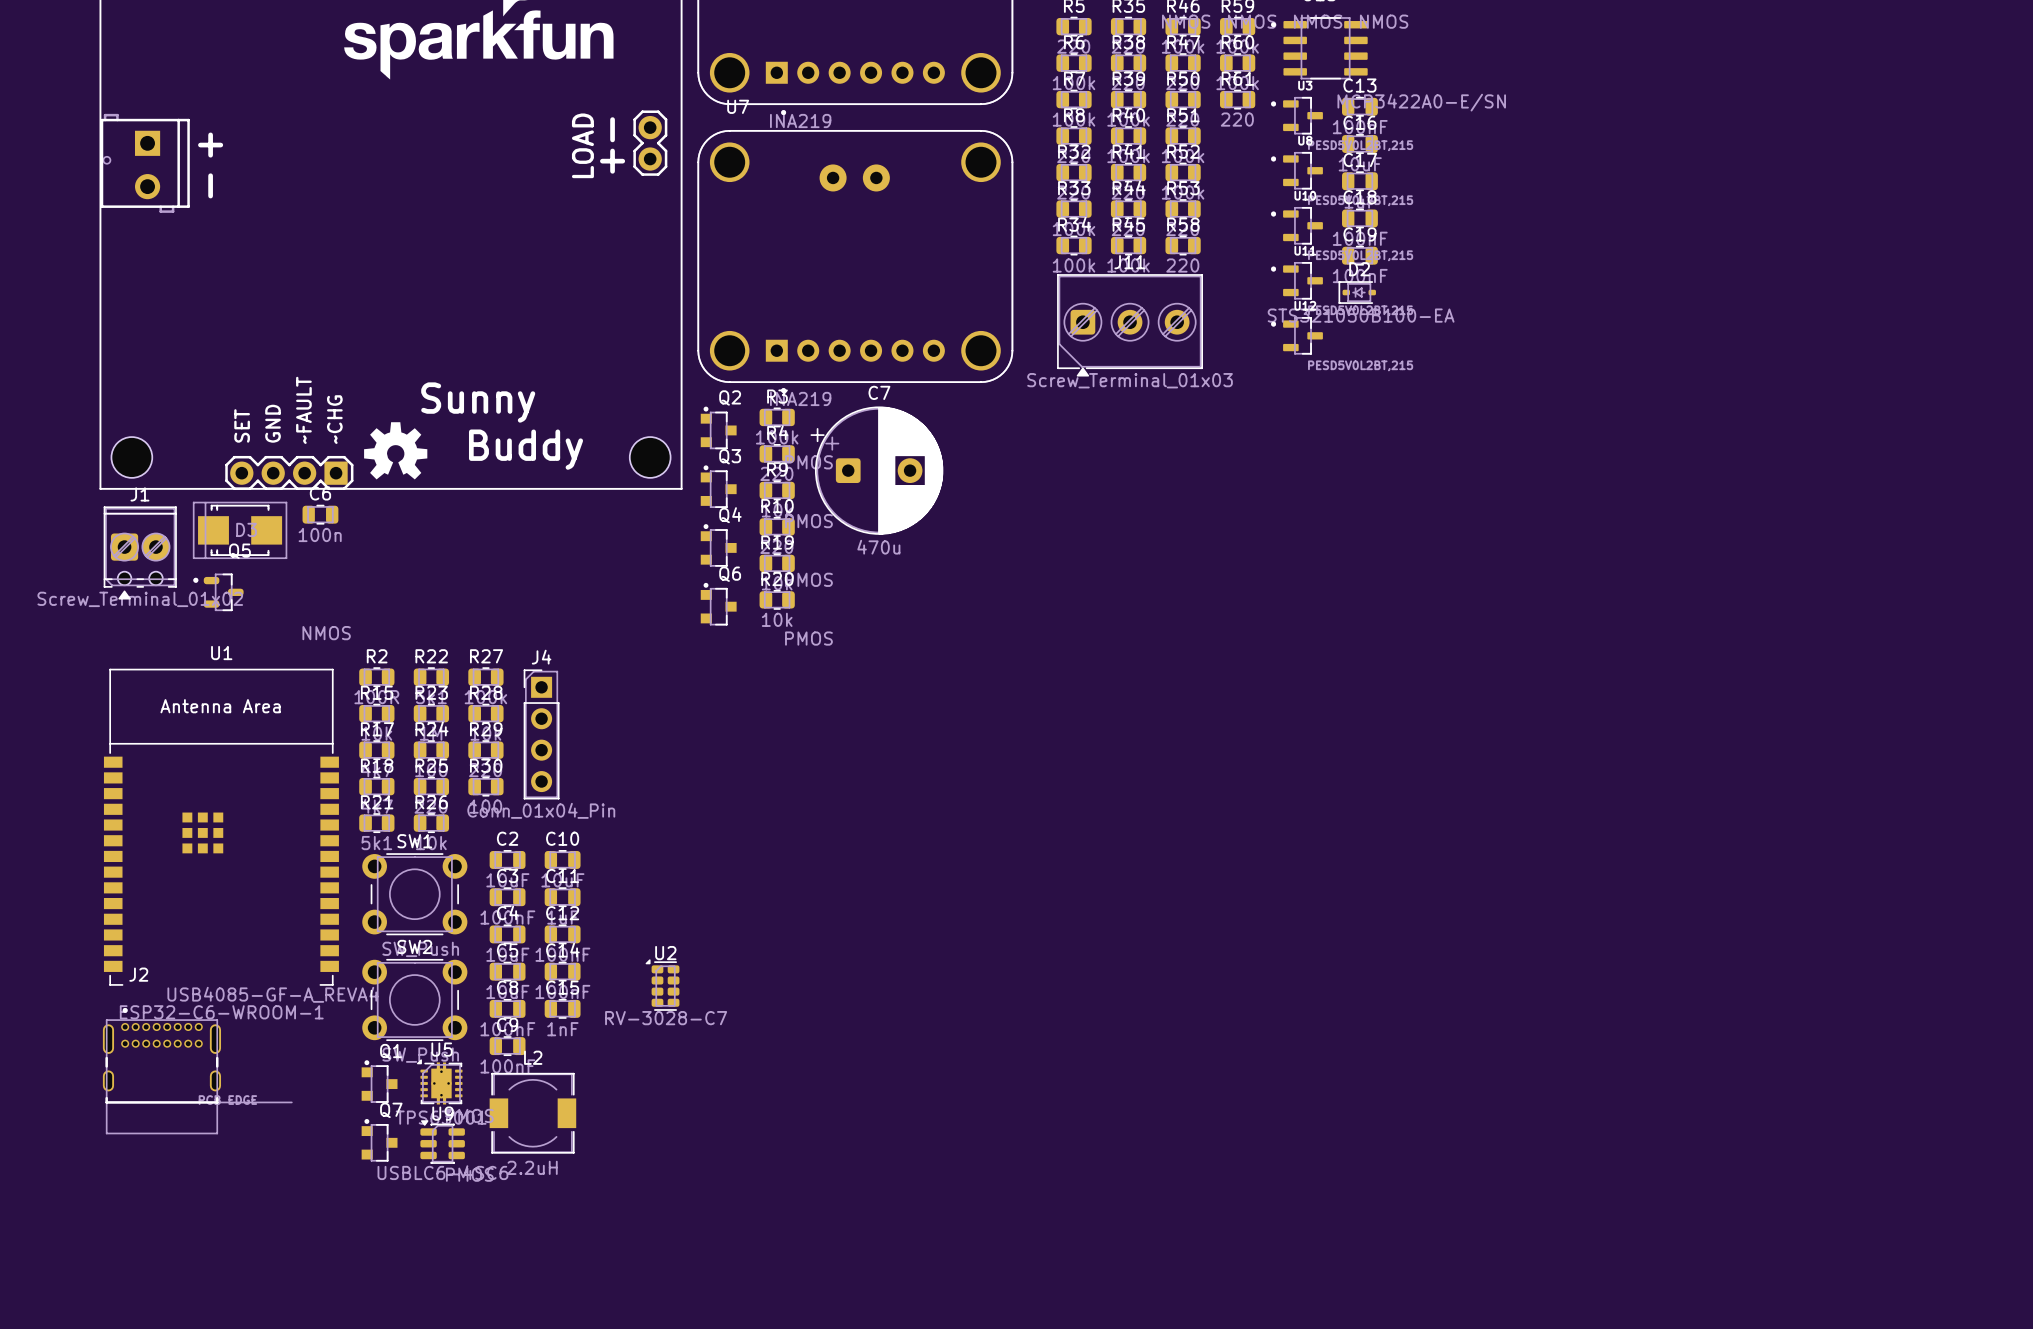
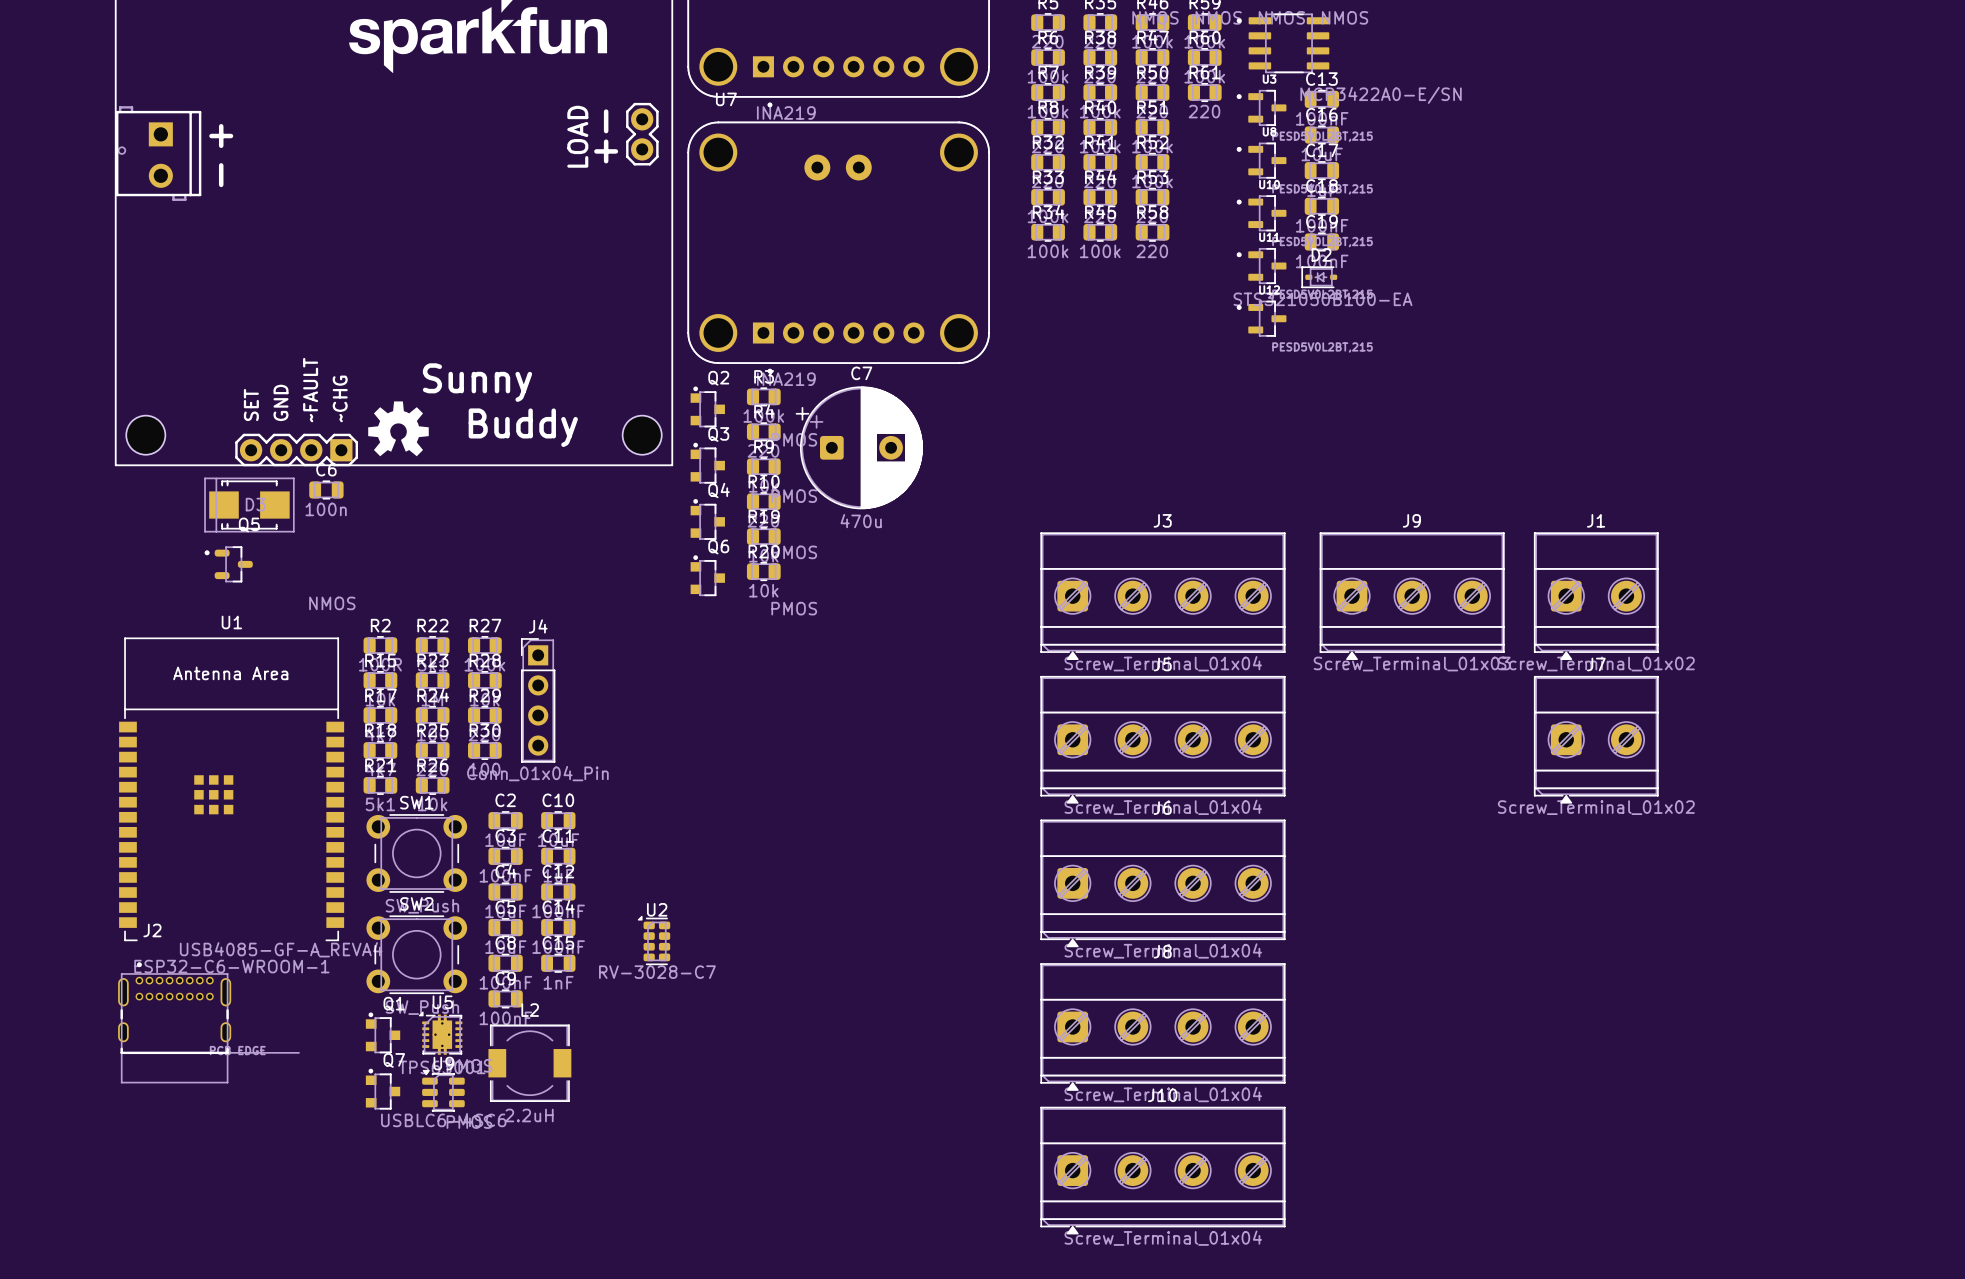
J11: Screw_Terminal_01x03 (1130, 325) -> none
J1 footprint: [103, 506, 177, 600] -> [1534, 532, 1659, 661]
J3: none -> Screw_Terminal_01x04 (1162, 596)
J9: none -> Screw_Terminal_01x03 (1412, 596)
J5: none -> Screw_Terminal_01x04 (1162, 739)
J7: none -> Screw_Terminal_01x02 (1596, 739)
J6: none -> Screw_Terminal_01x04 (1162, 883)
J8: none -> Screw_Terminal_01x04 (1162, 1027)
J10: none -> Screw_Terminal_01x04 (1162, 1170)

